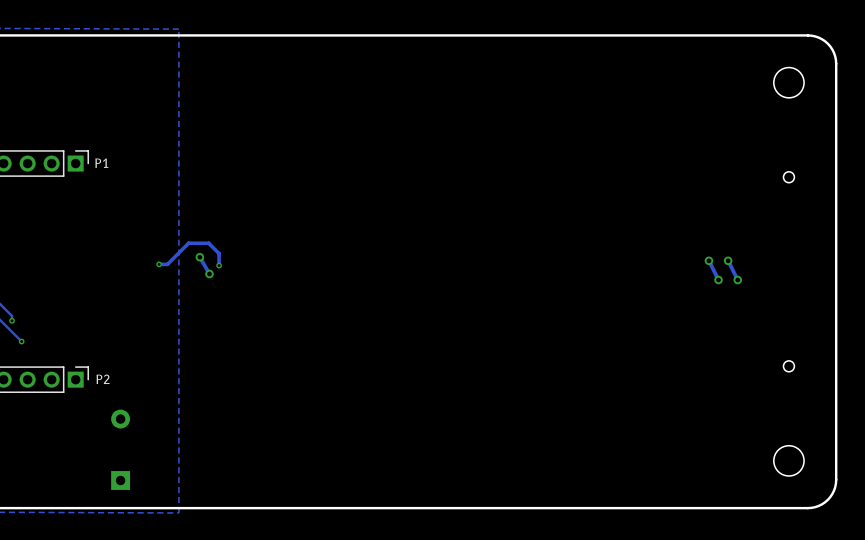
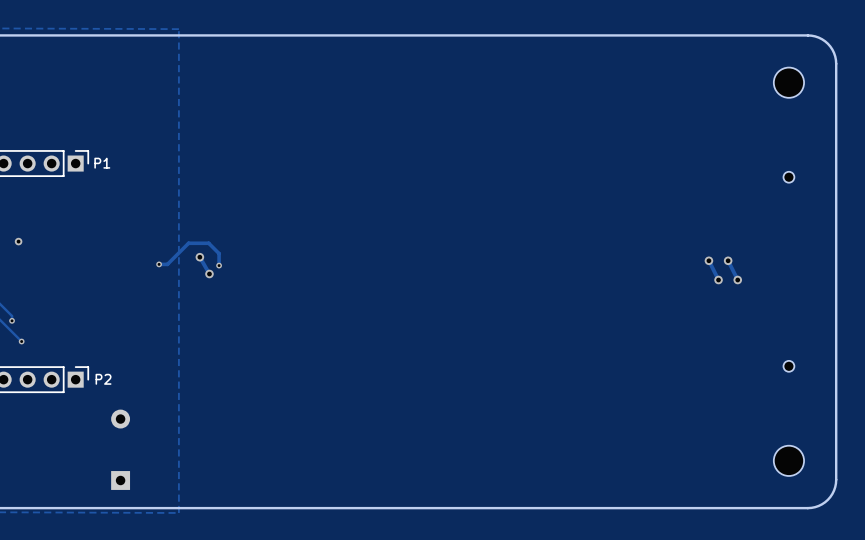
via: none -> (18, 241)

